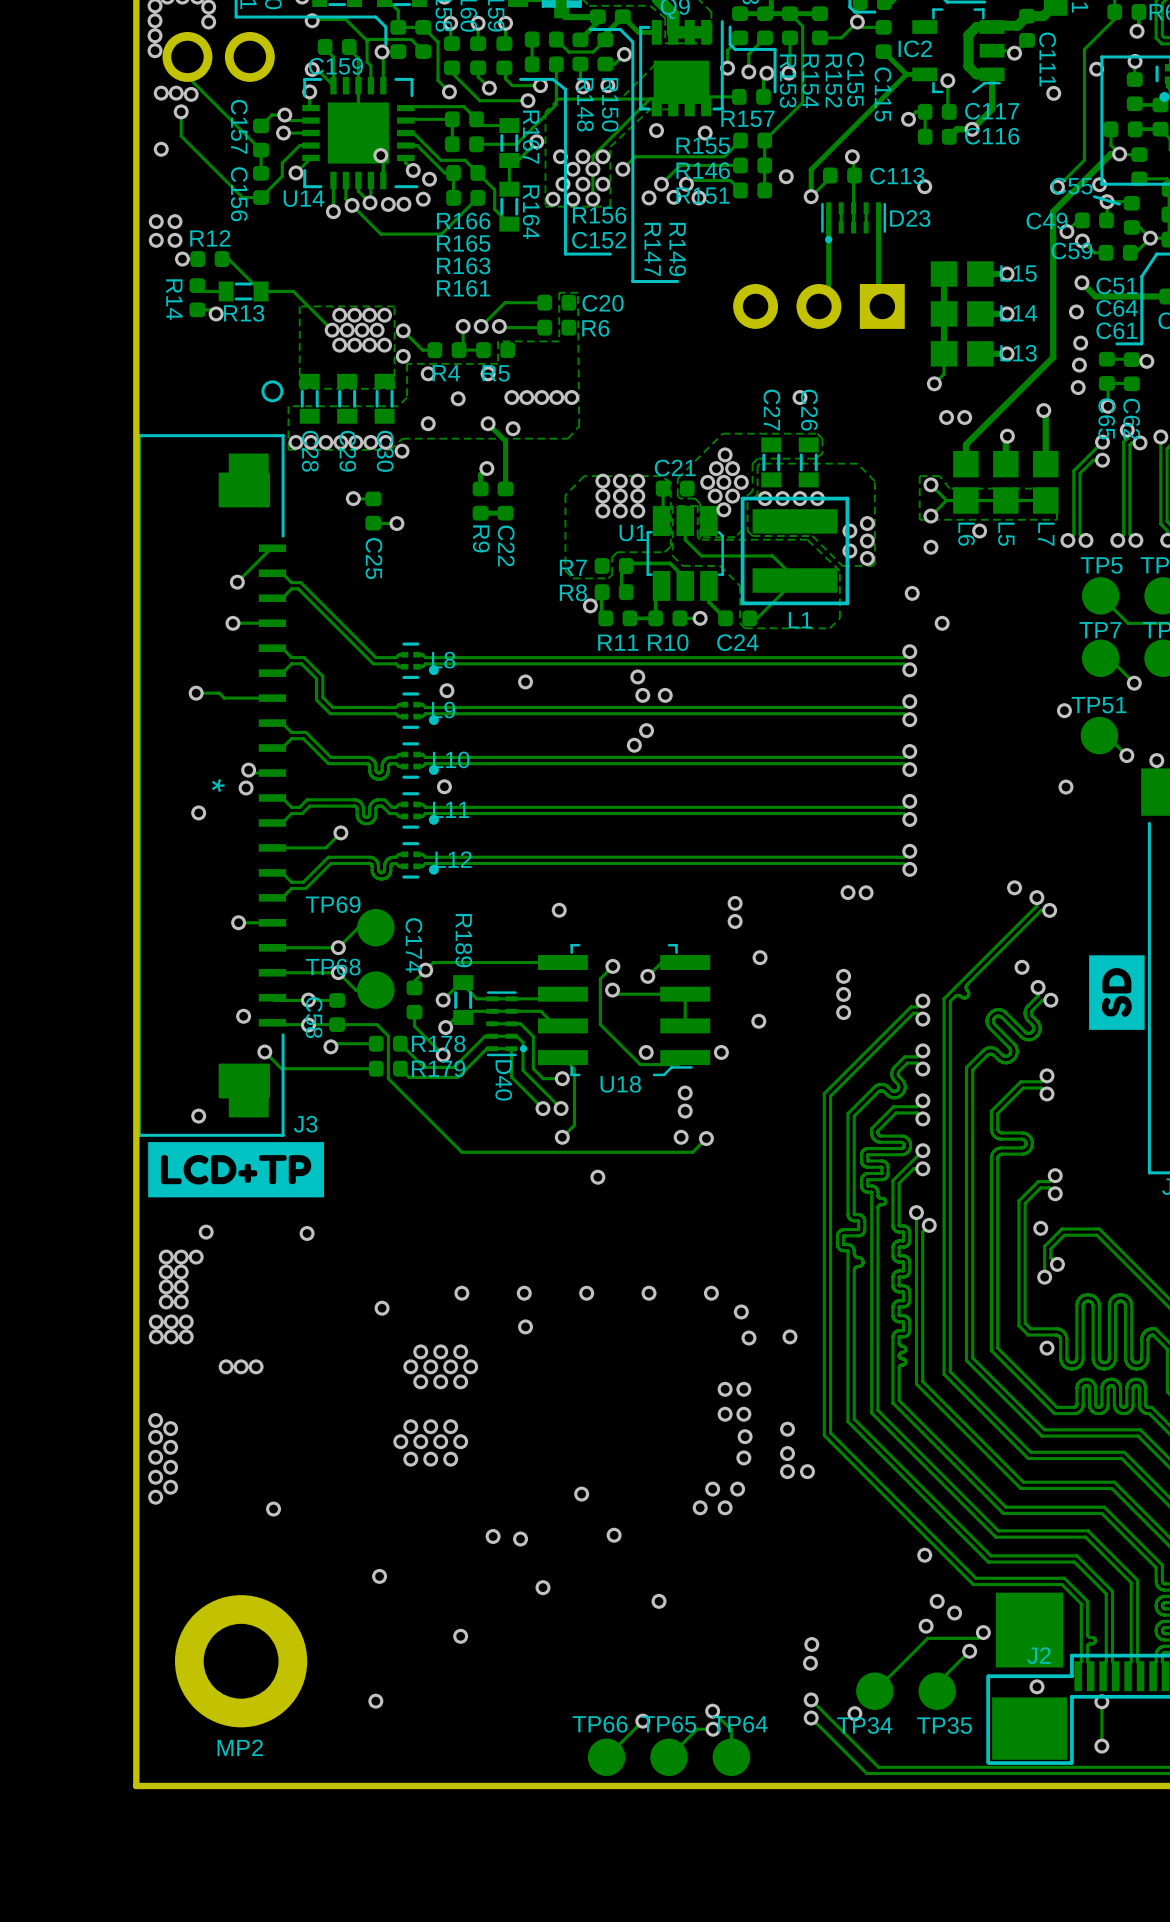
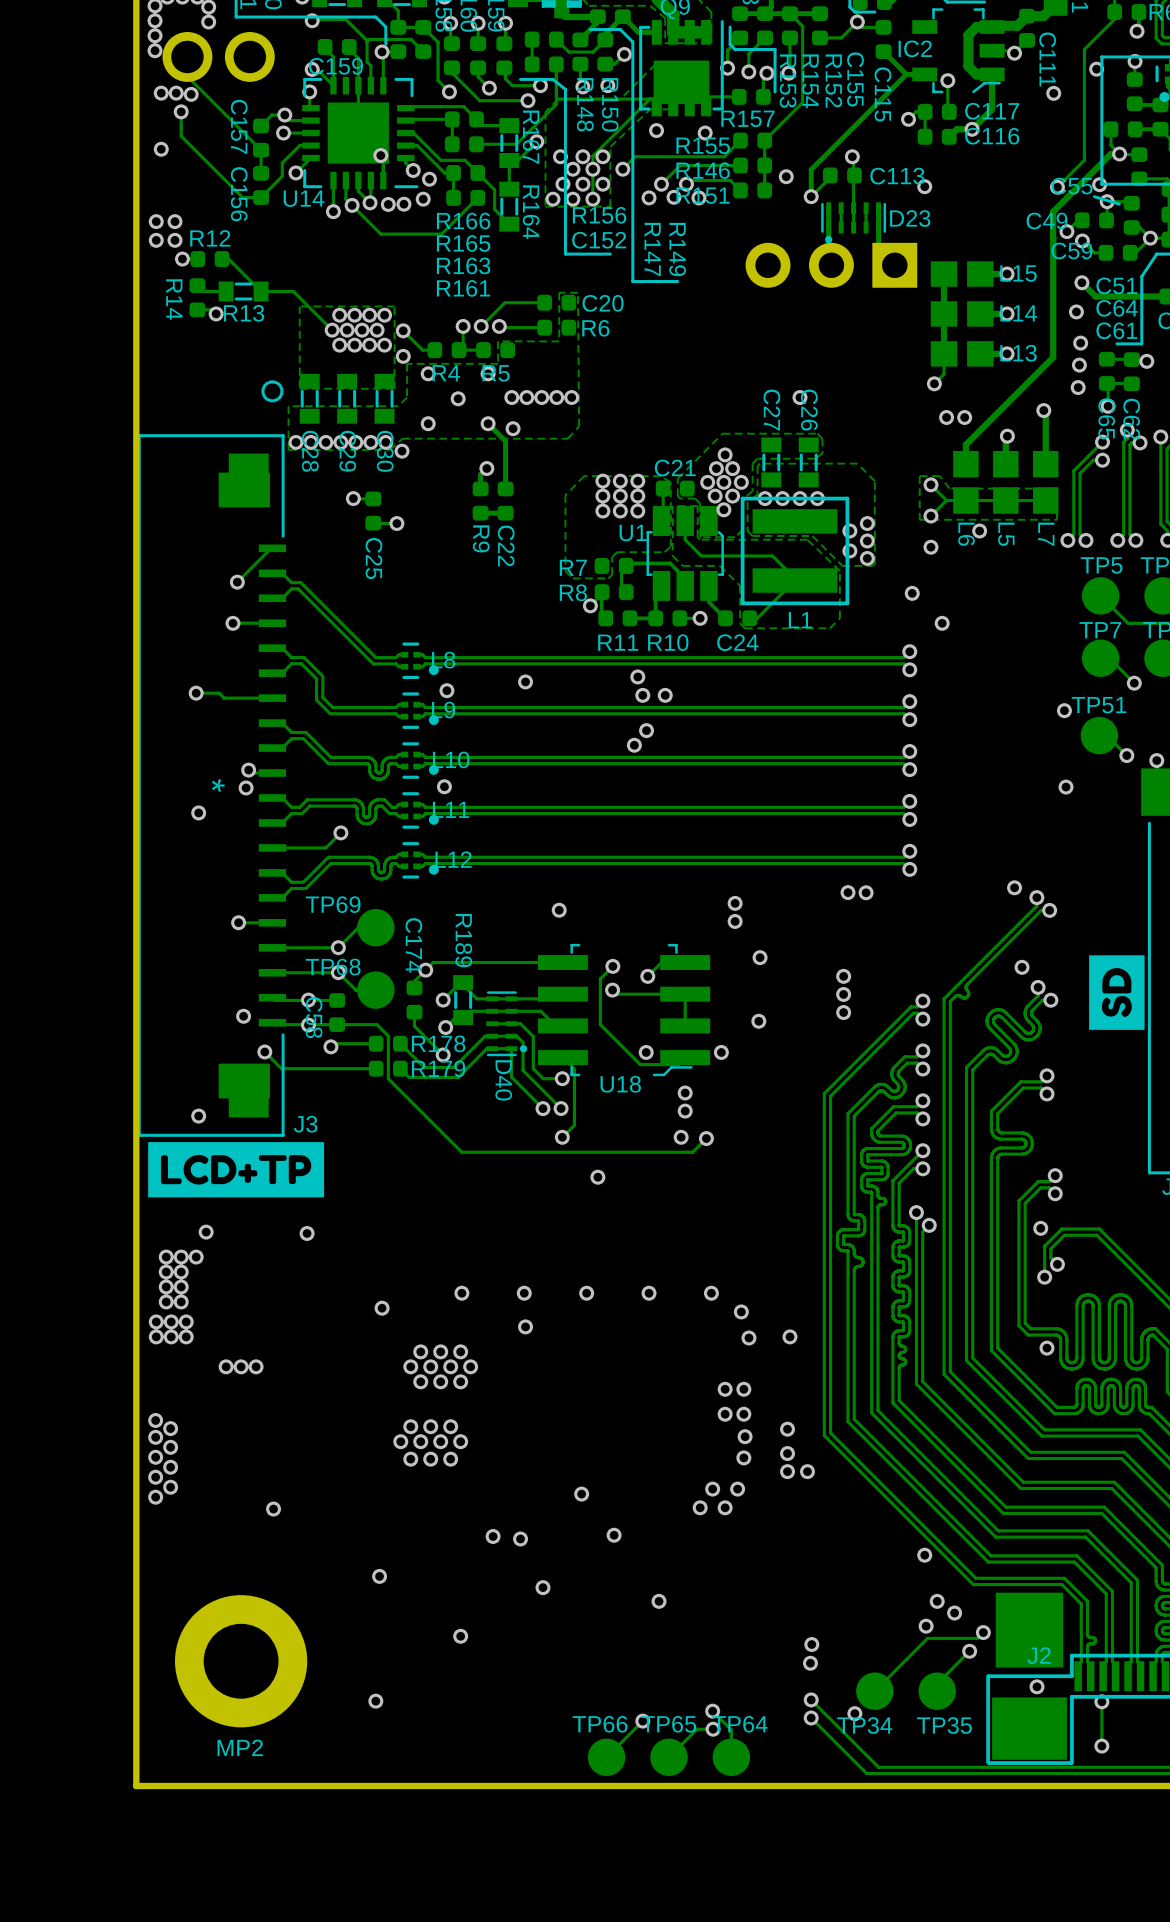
track: (878, 249) (878, 302) (882, 306) -> none
track: (828, 262) (828, 296) (818, 306) -> none
part position: (818, 306) -> (831, 265)

